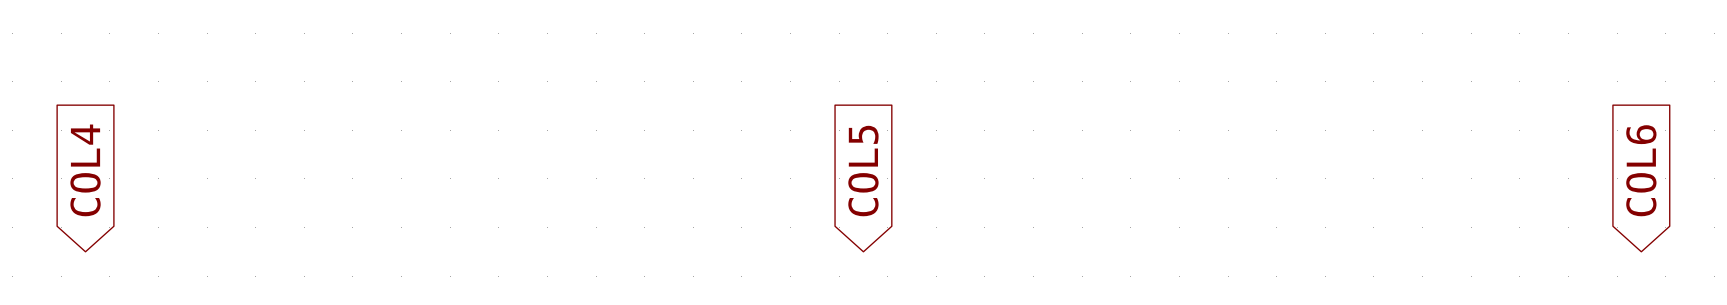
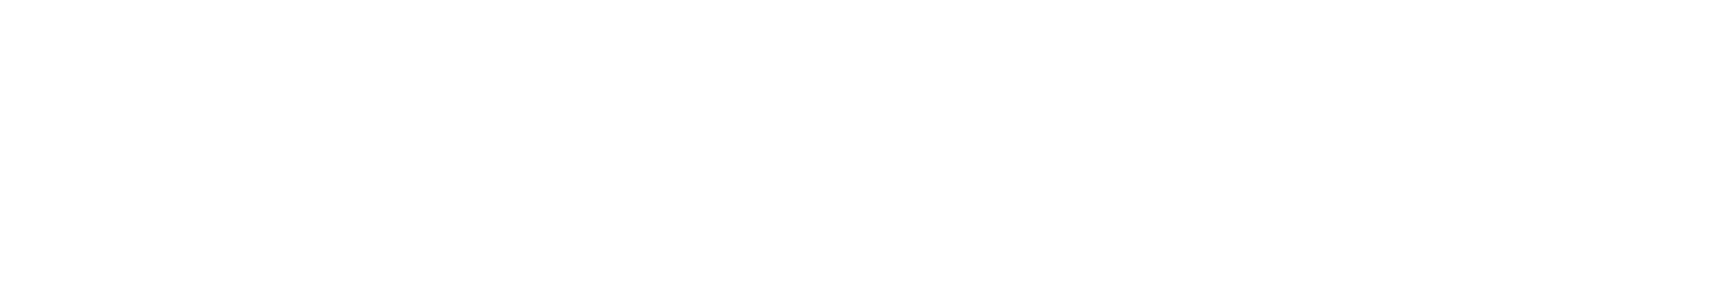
global label: COL4 (85, 170) -> none
global label: COL6 (1641, 170) -> none
global label: COL5 (863, 171) -> none

